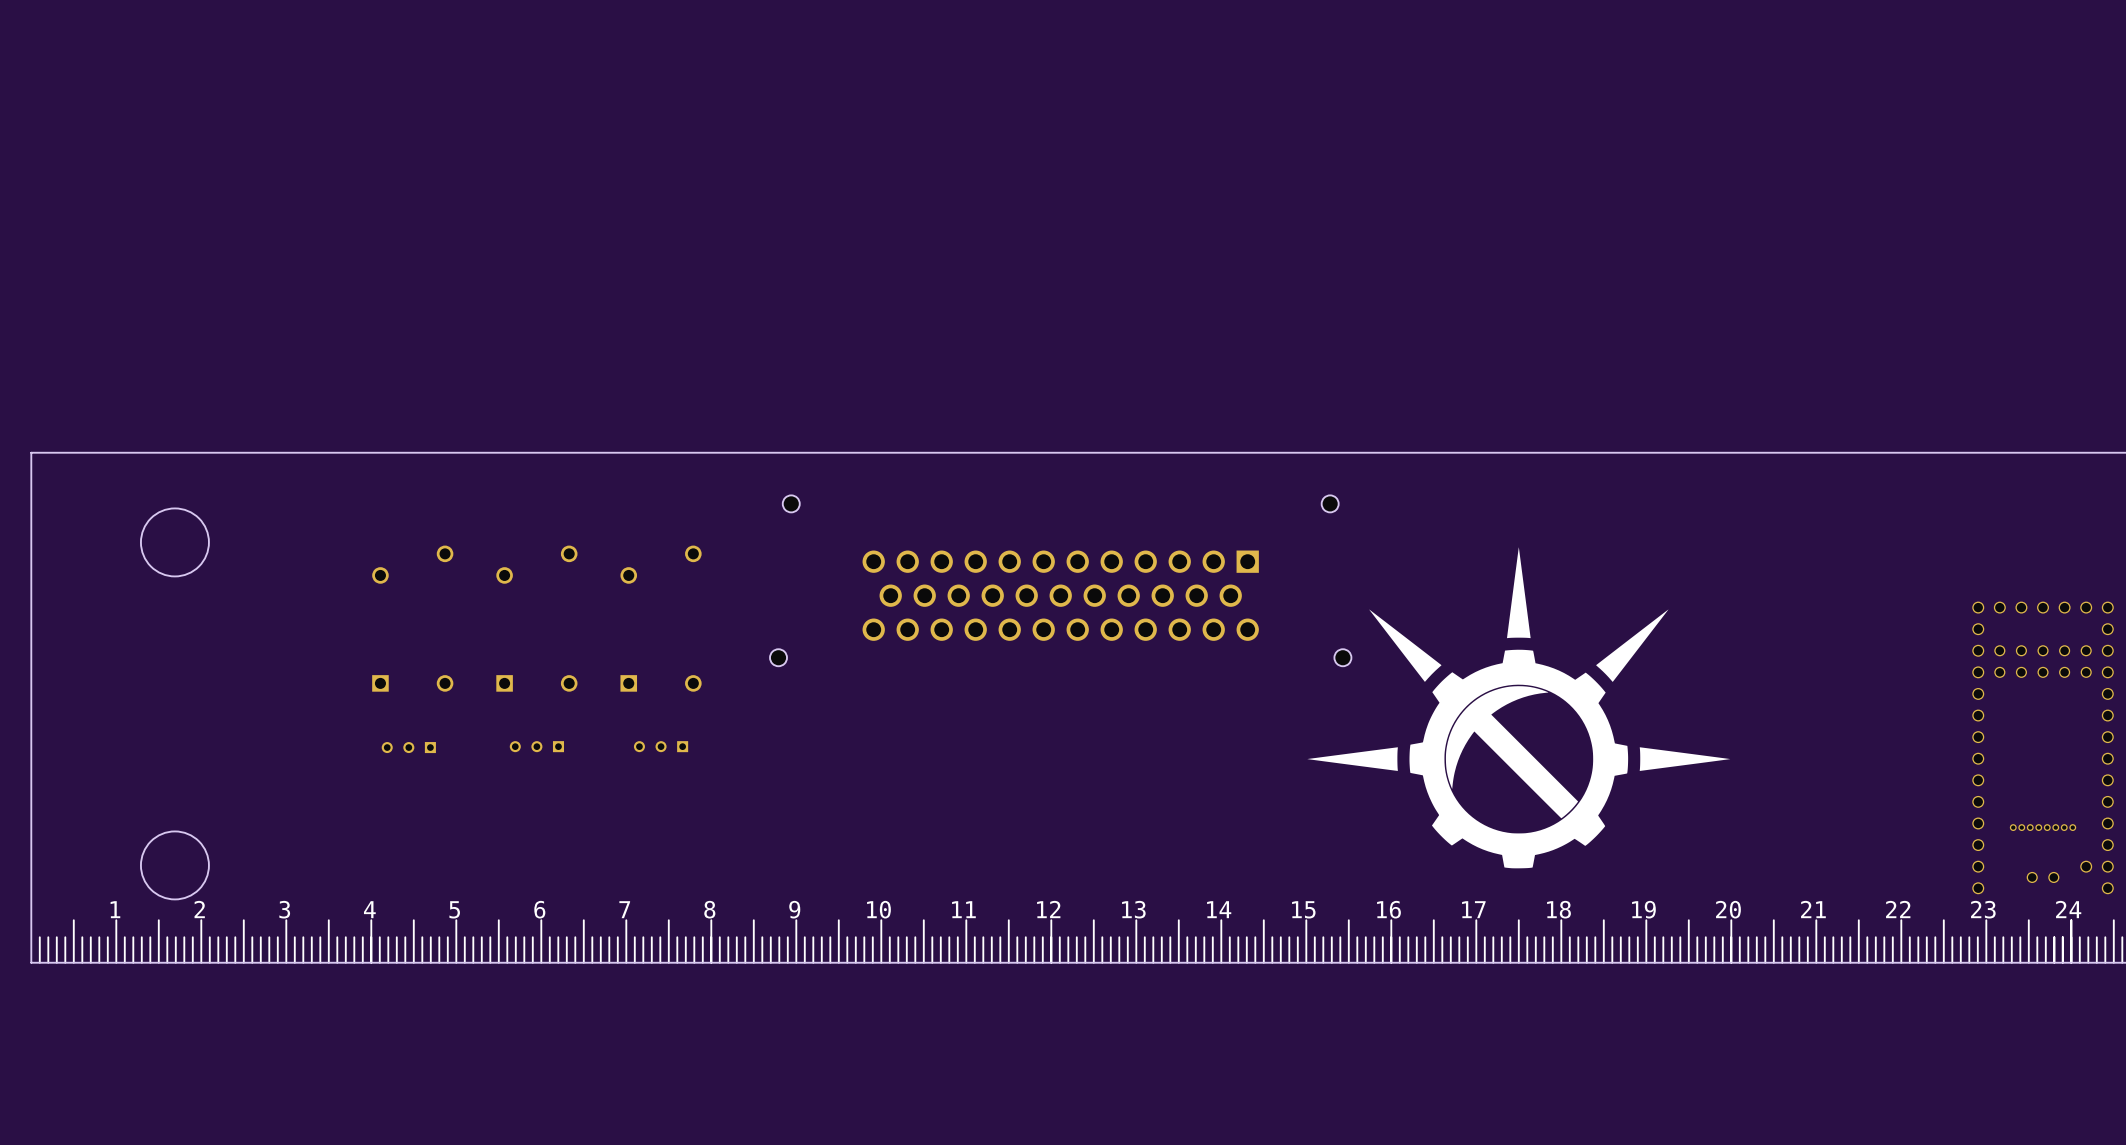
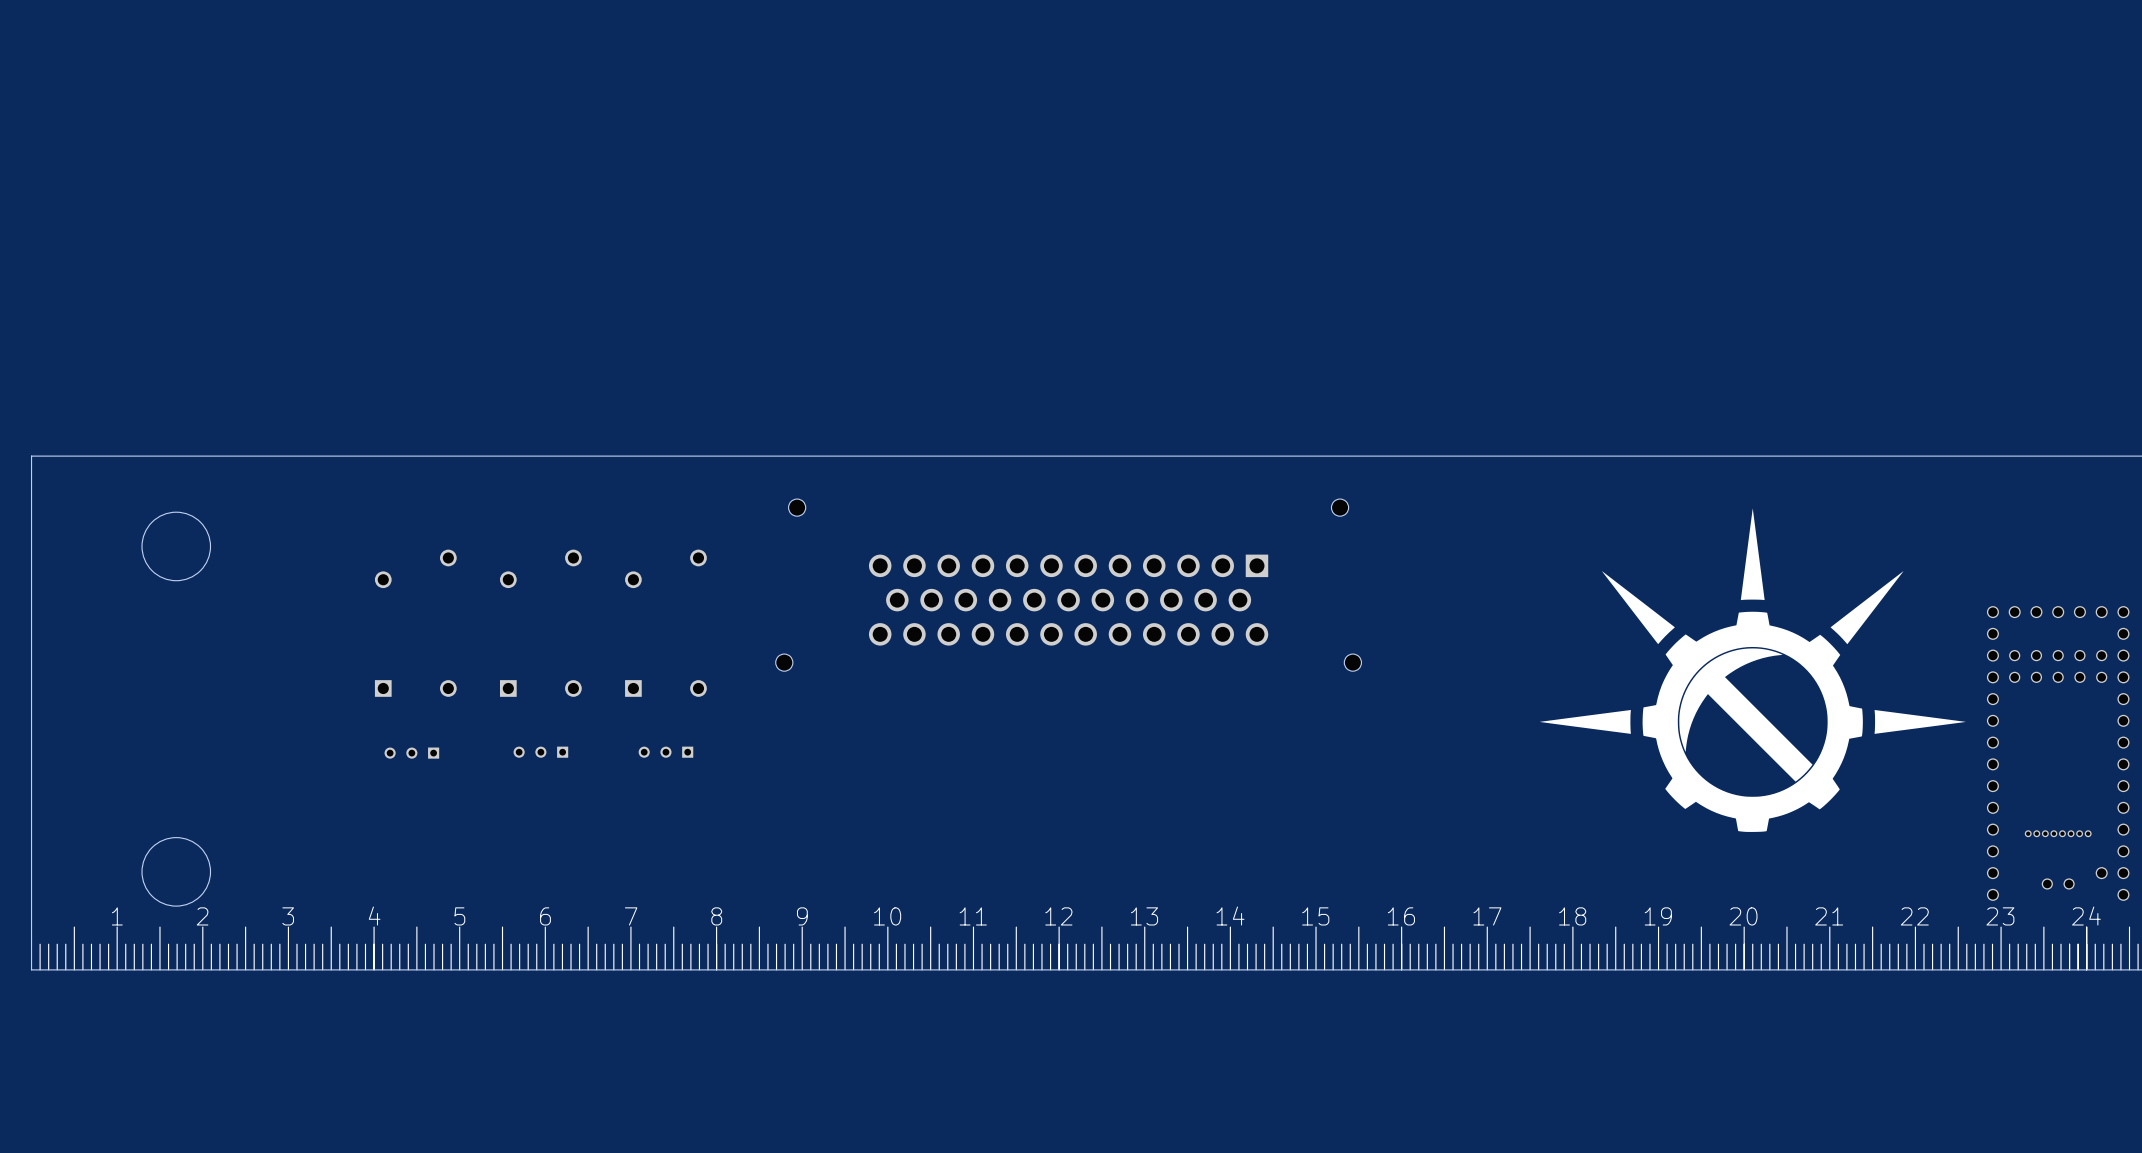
drawing: none -> [1539, 508, 1966, 832]
drawing: [1307, 547, 1731, 869] -> none

